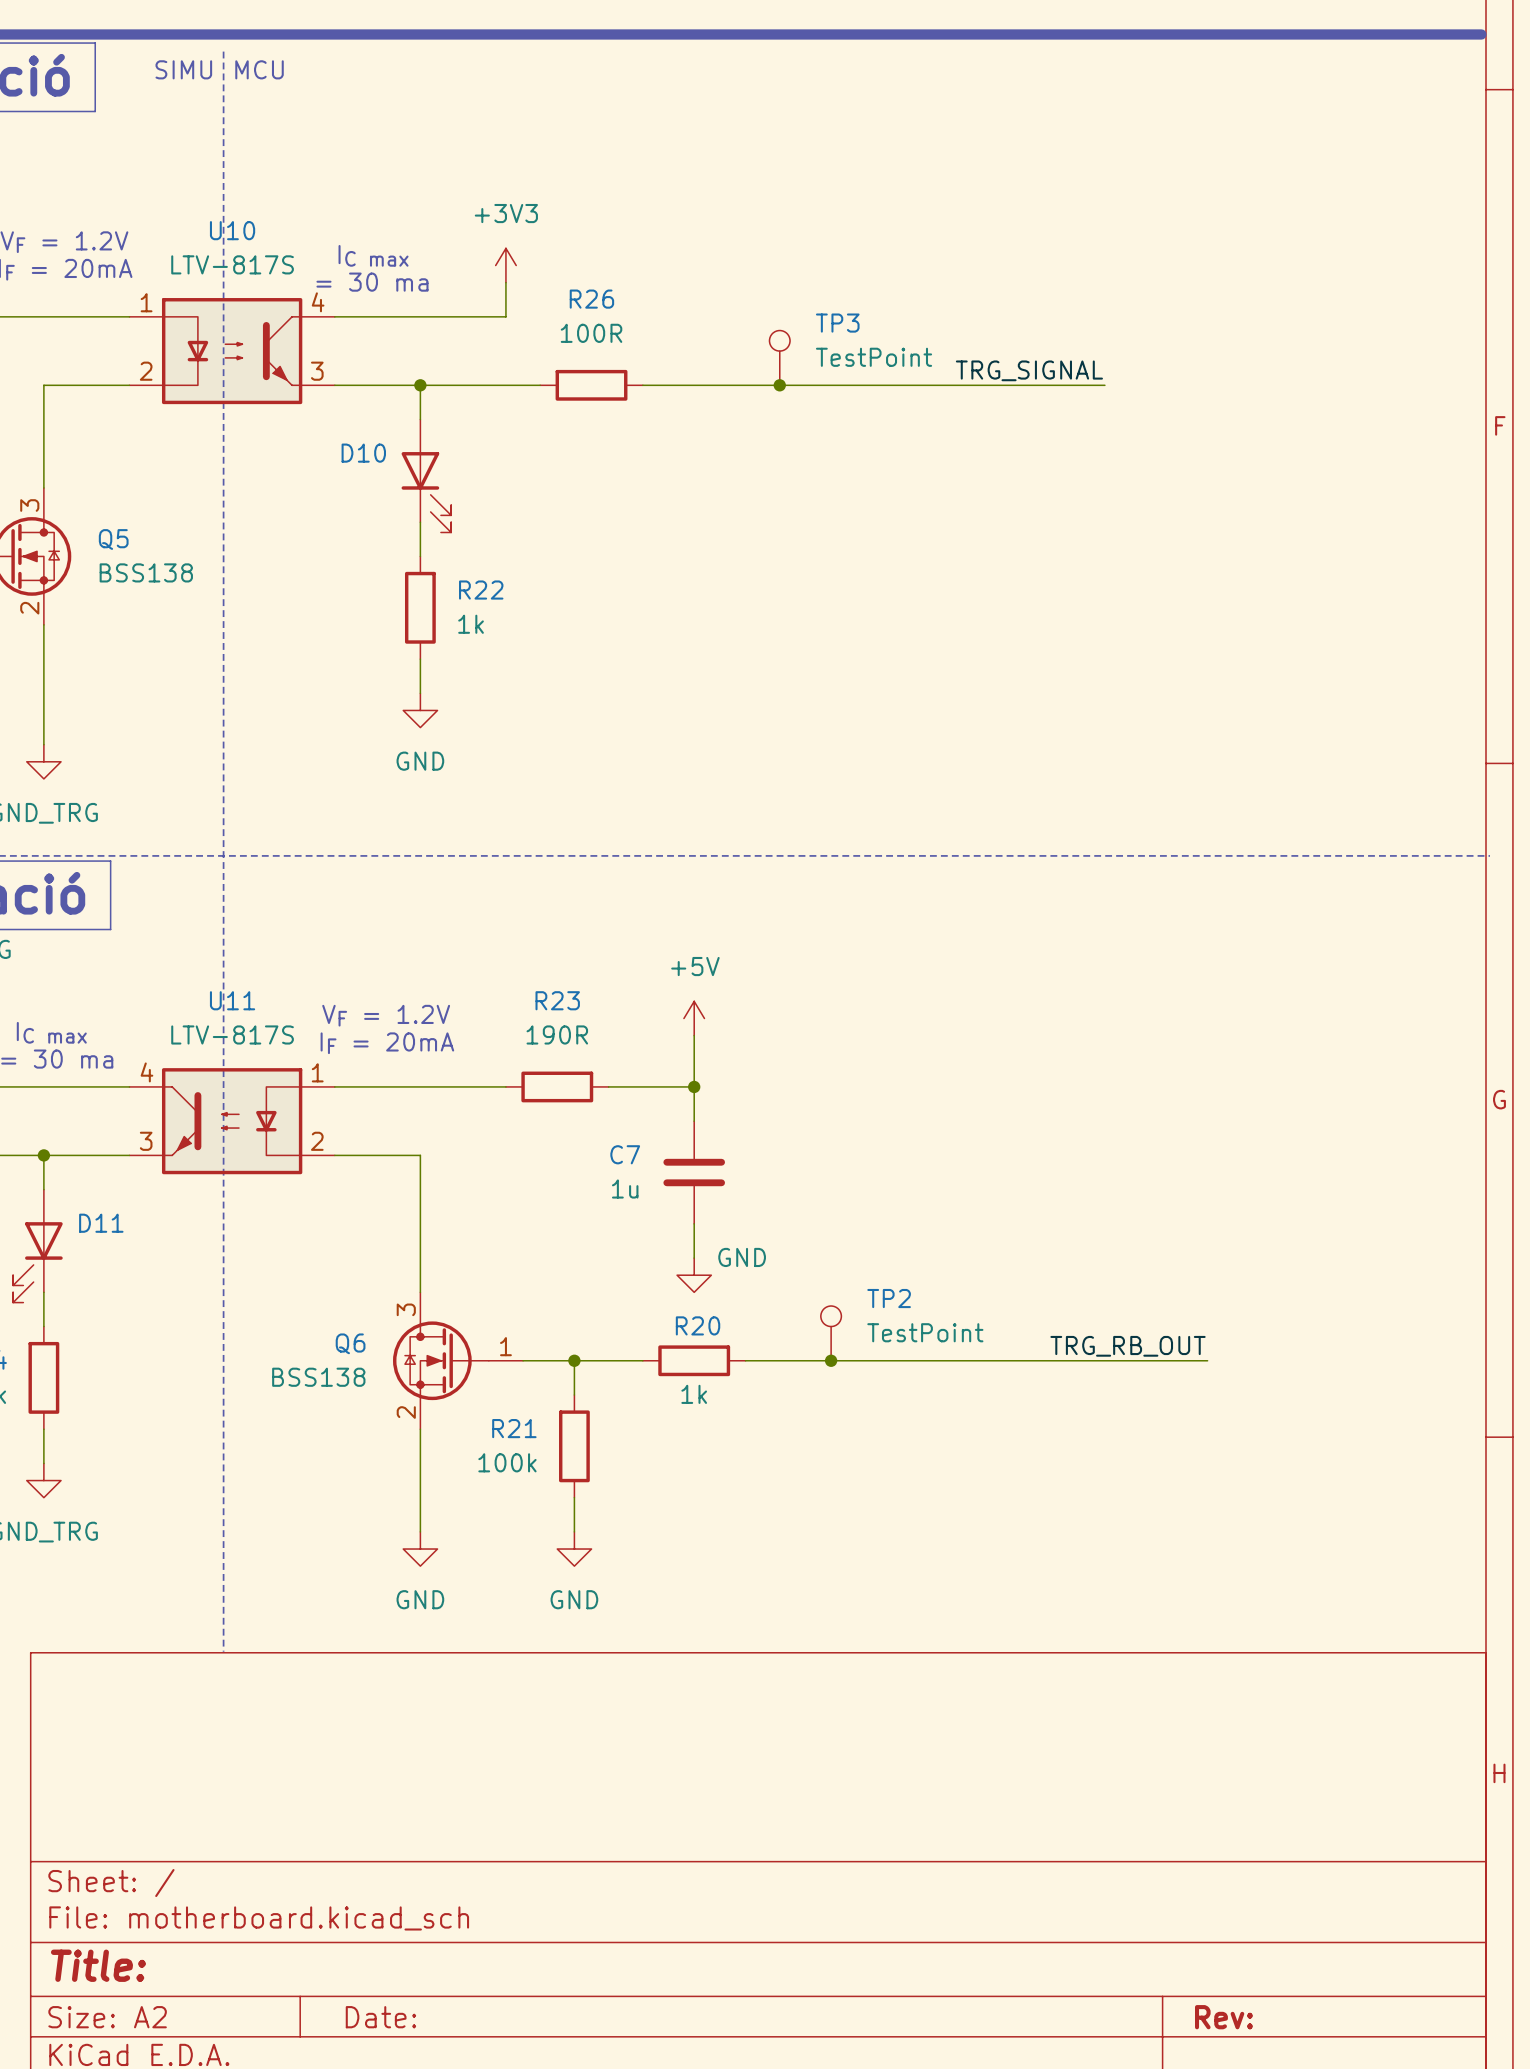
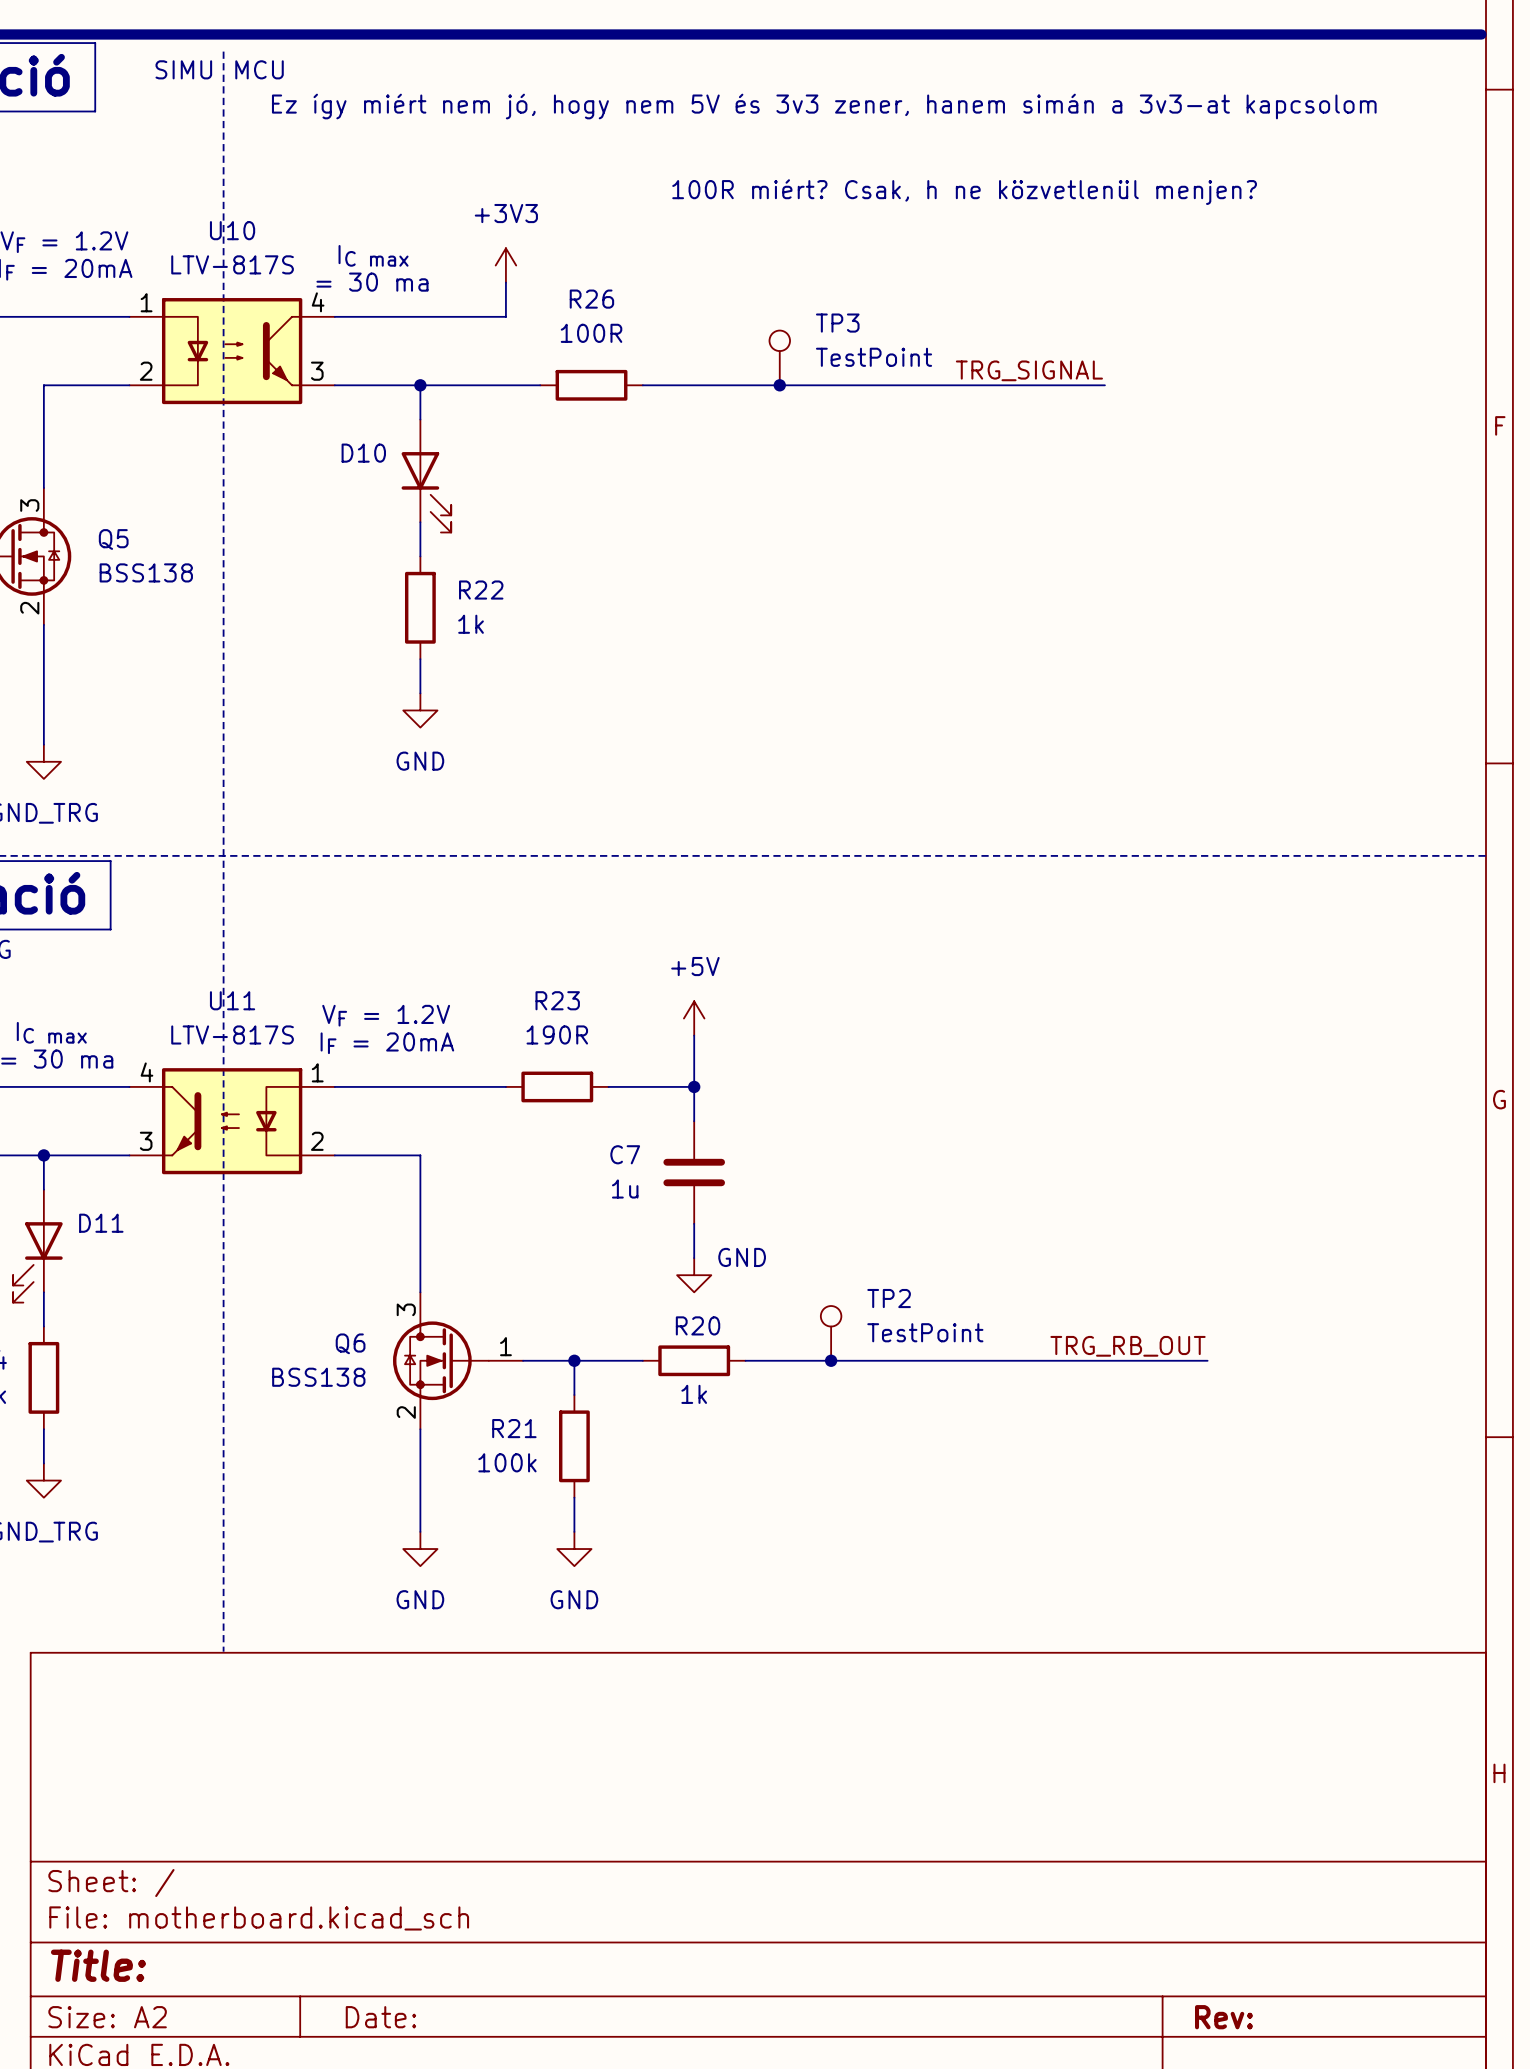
text: none -> Ez így miért nem jó, hogy nem 5V és 3v3 zener, hanem simán a 3v3-at kapcsolom (824, 106)
text: none -> 100R miért? Csak, h ne közvetlenül menjen? (964, 192)

